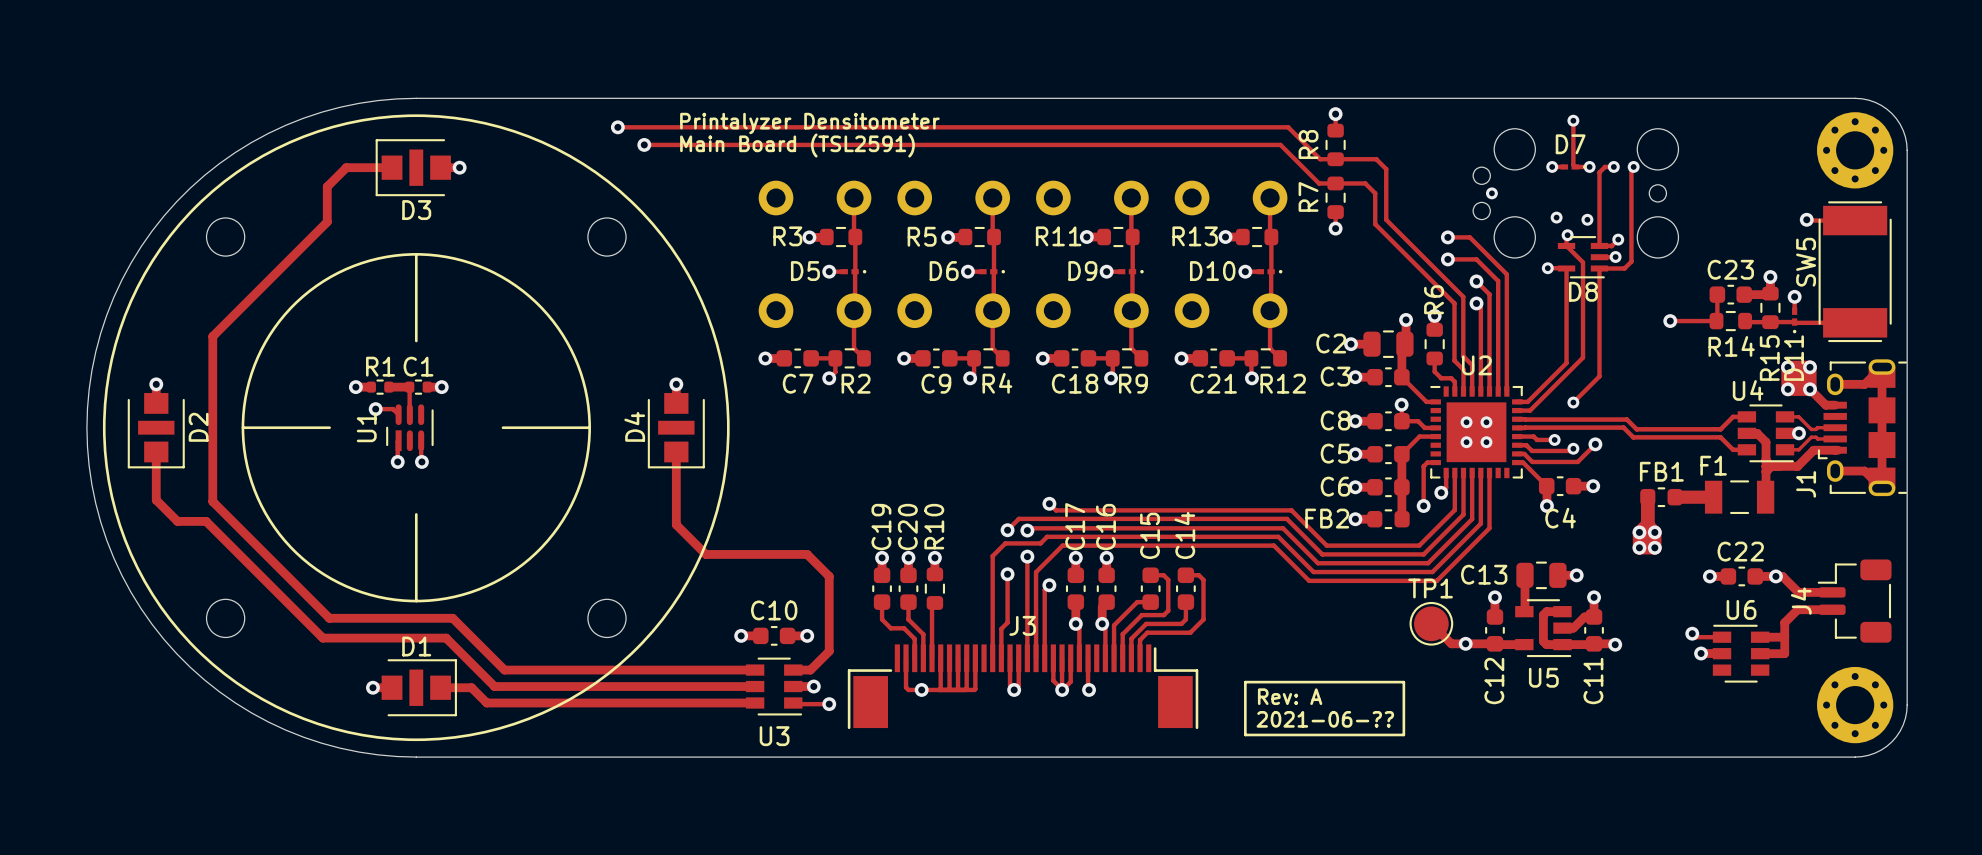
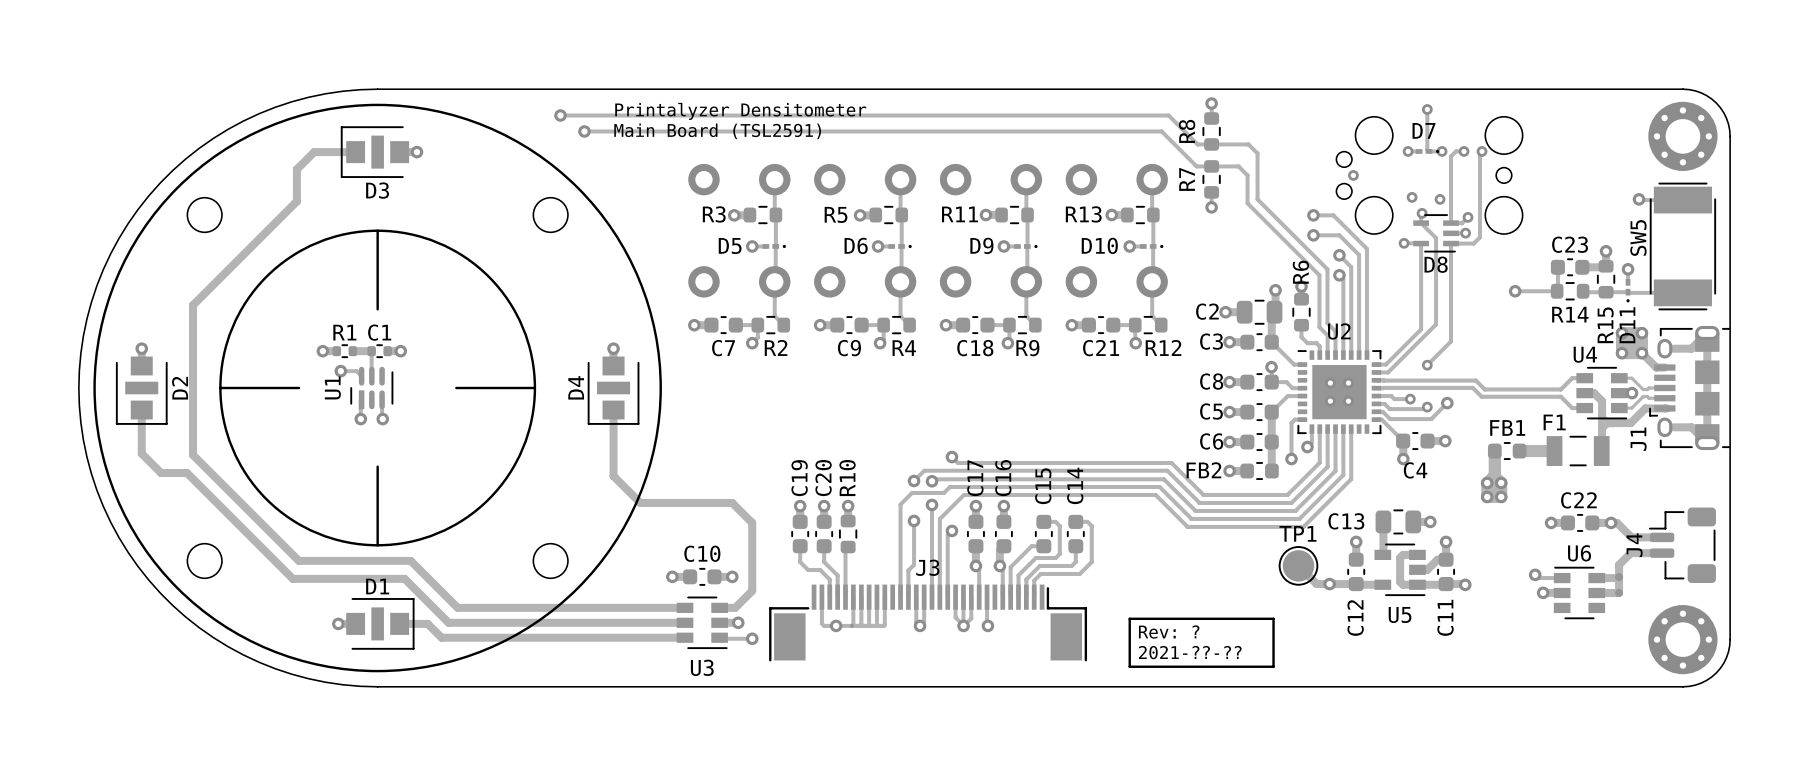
text: Rev: A (1290, 696) -> Rev: ? (1169, 632)
text: 2021-06-?? (1325, 719) -> 2021-??-?? (1190, 652)

